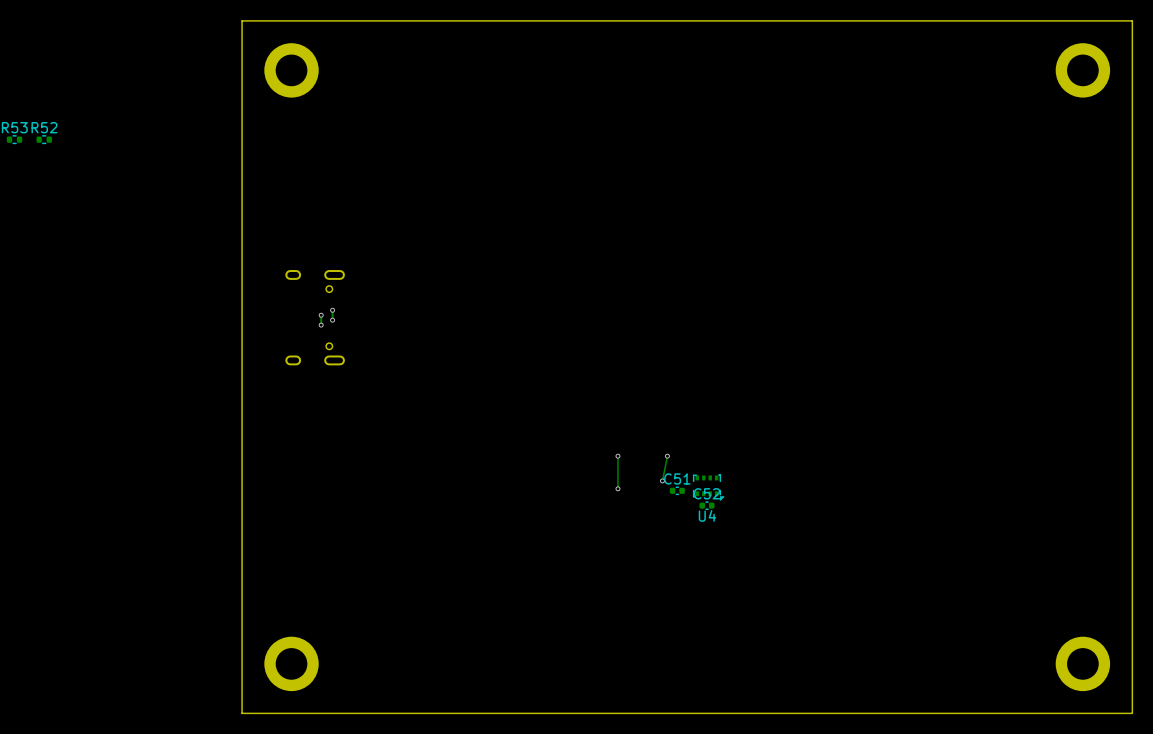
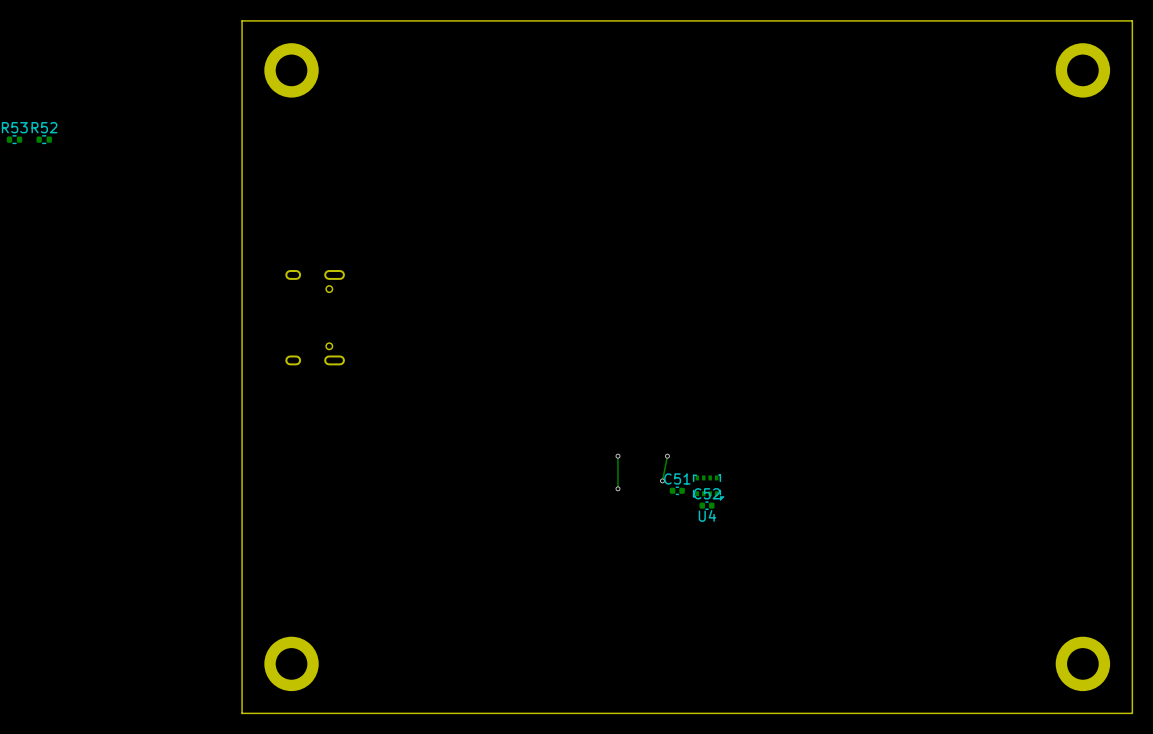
track: (332, 310) (332, 320) -> none
via: (332, 310) -> none
track: (321, 315) (321, 325) -> none
via: (321, 315) -> none
via: (332, 320) -> none
via: (321, 325) -> none

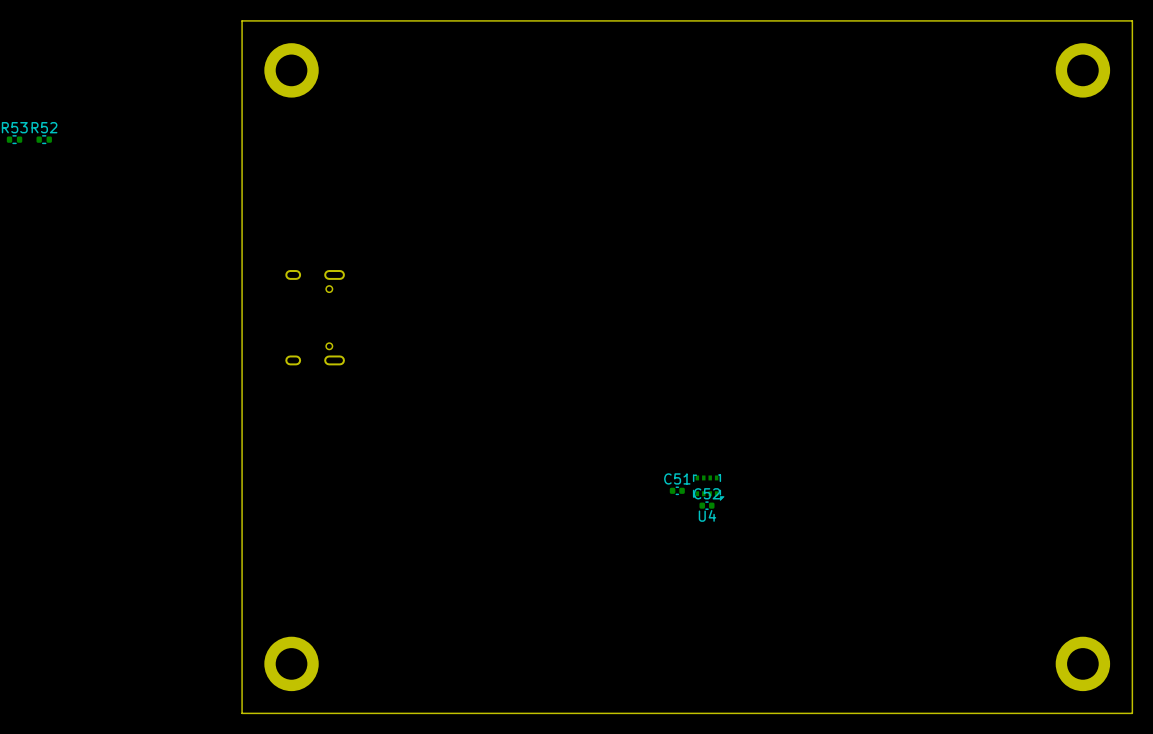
track: (617, 456) (617, 488) -> none
via: (617, 456) -> none
track: (667, 456) (662, 480) -> none
via: (667, 456) -> none
via: (662, 480) -> none
via: (617, 488) -> none

